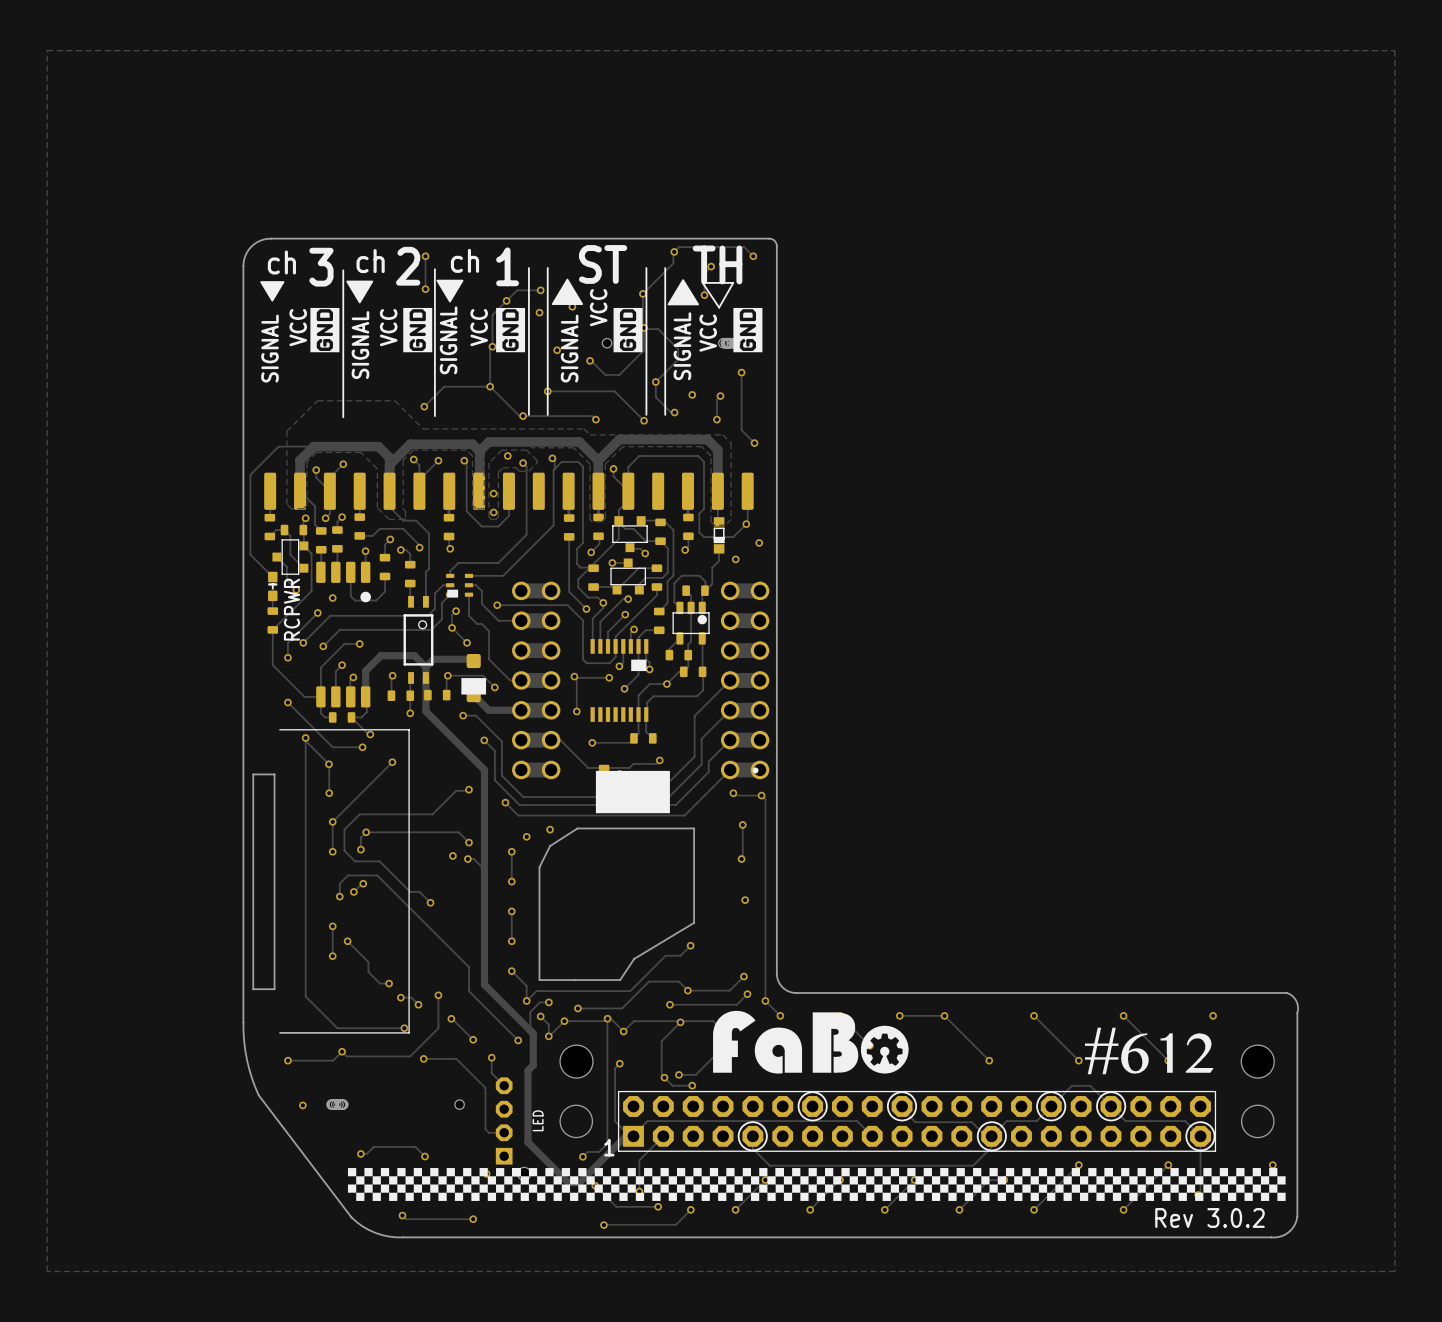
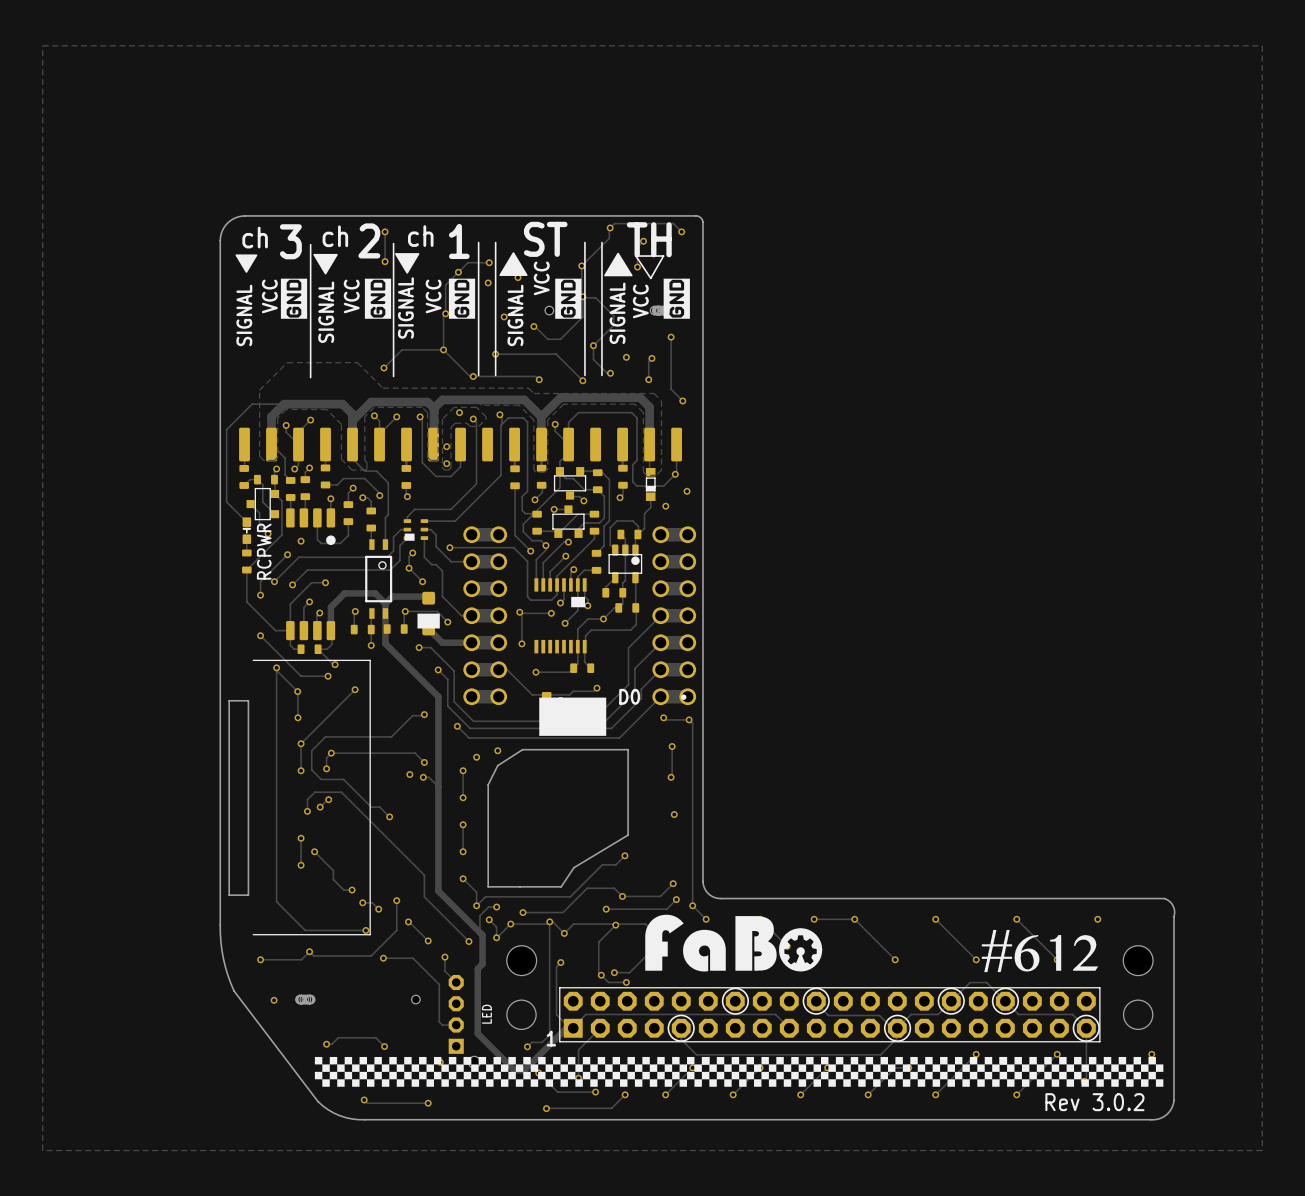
text: none -> D0 (629, 696)

